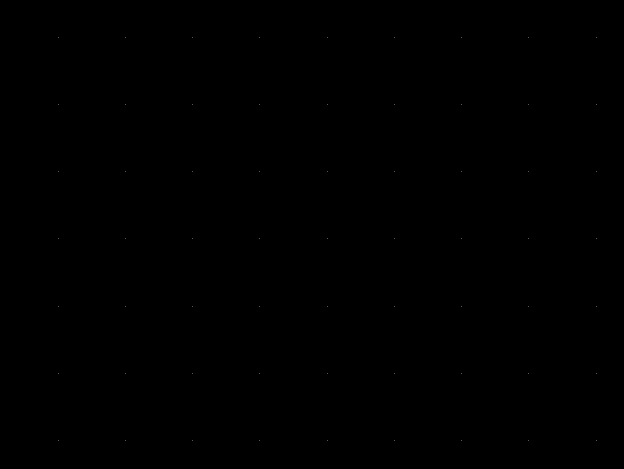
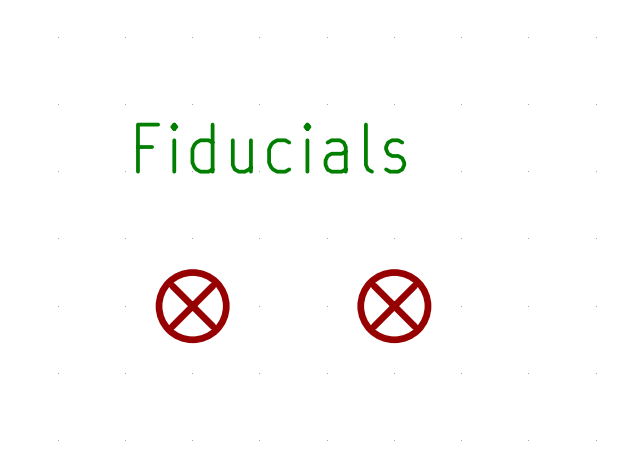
text: none -> Fiducials (271, 148)
part: none -> (192, 306)
part: none -> (394, 306)

